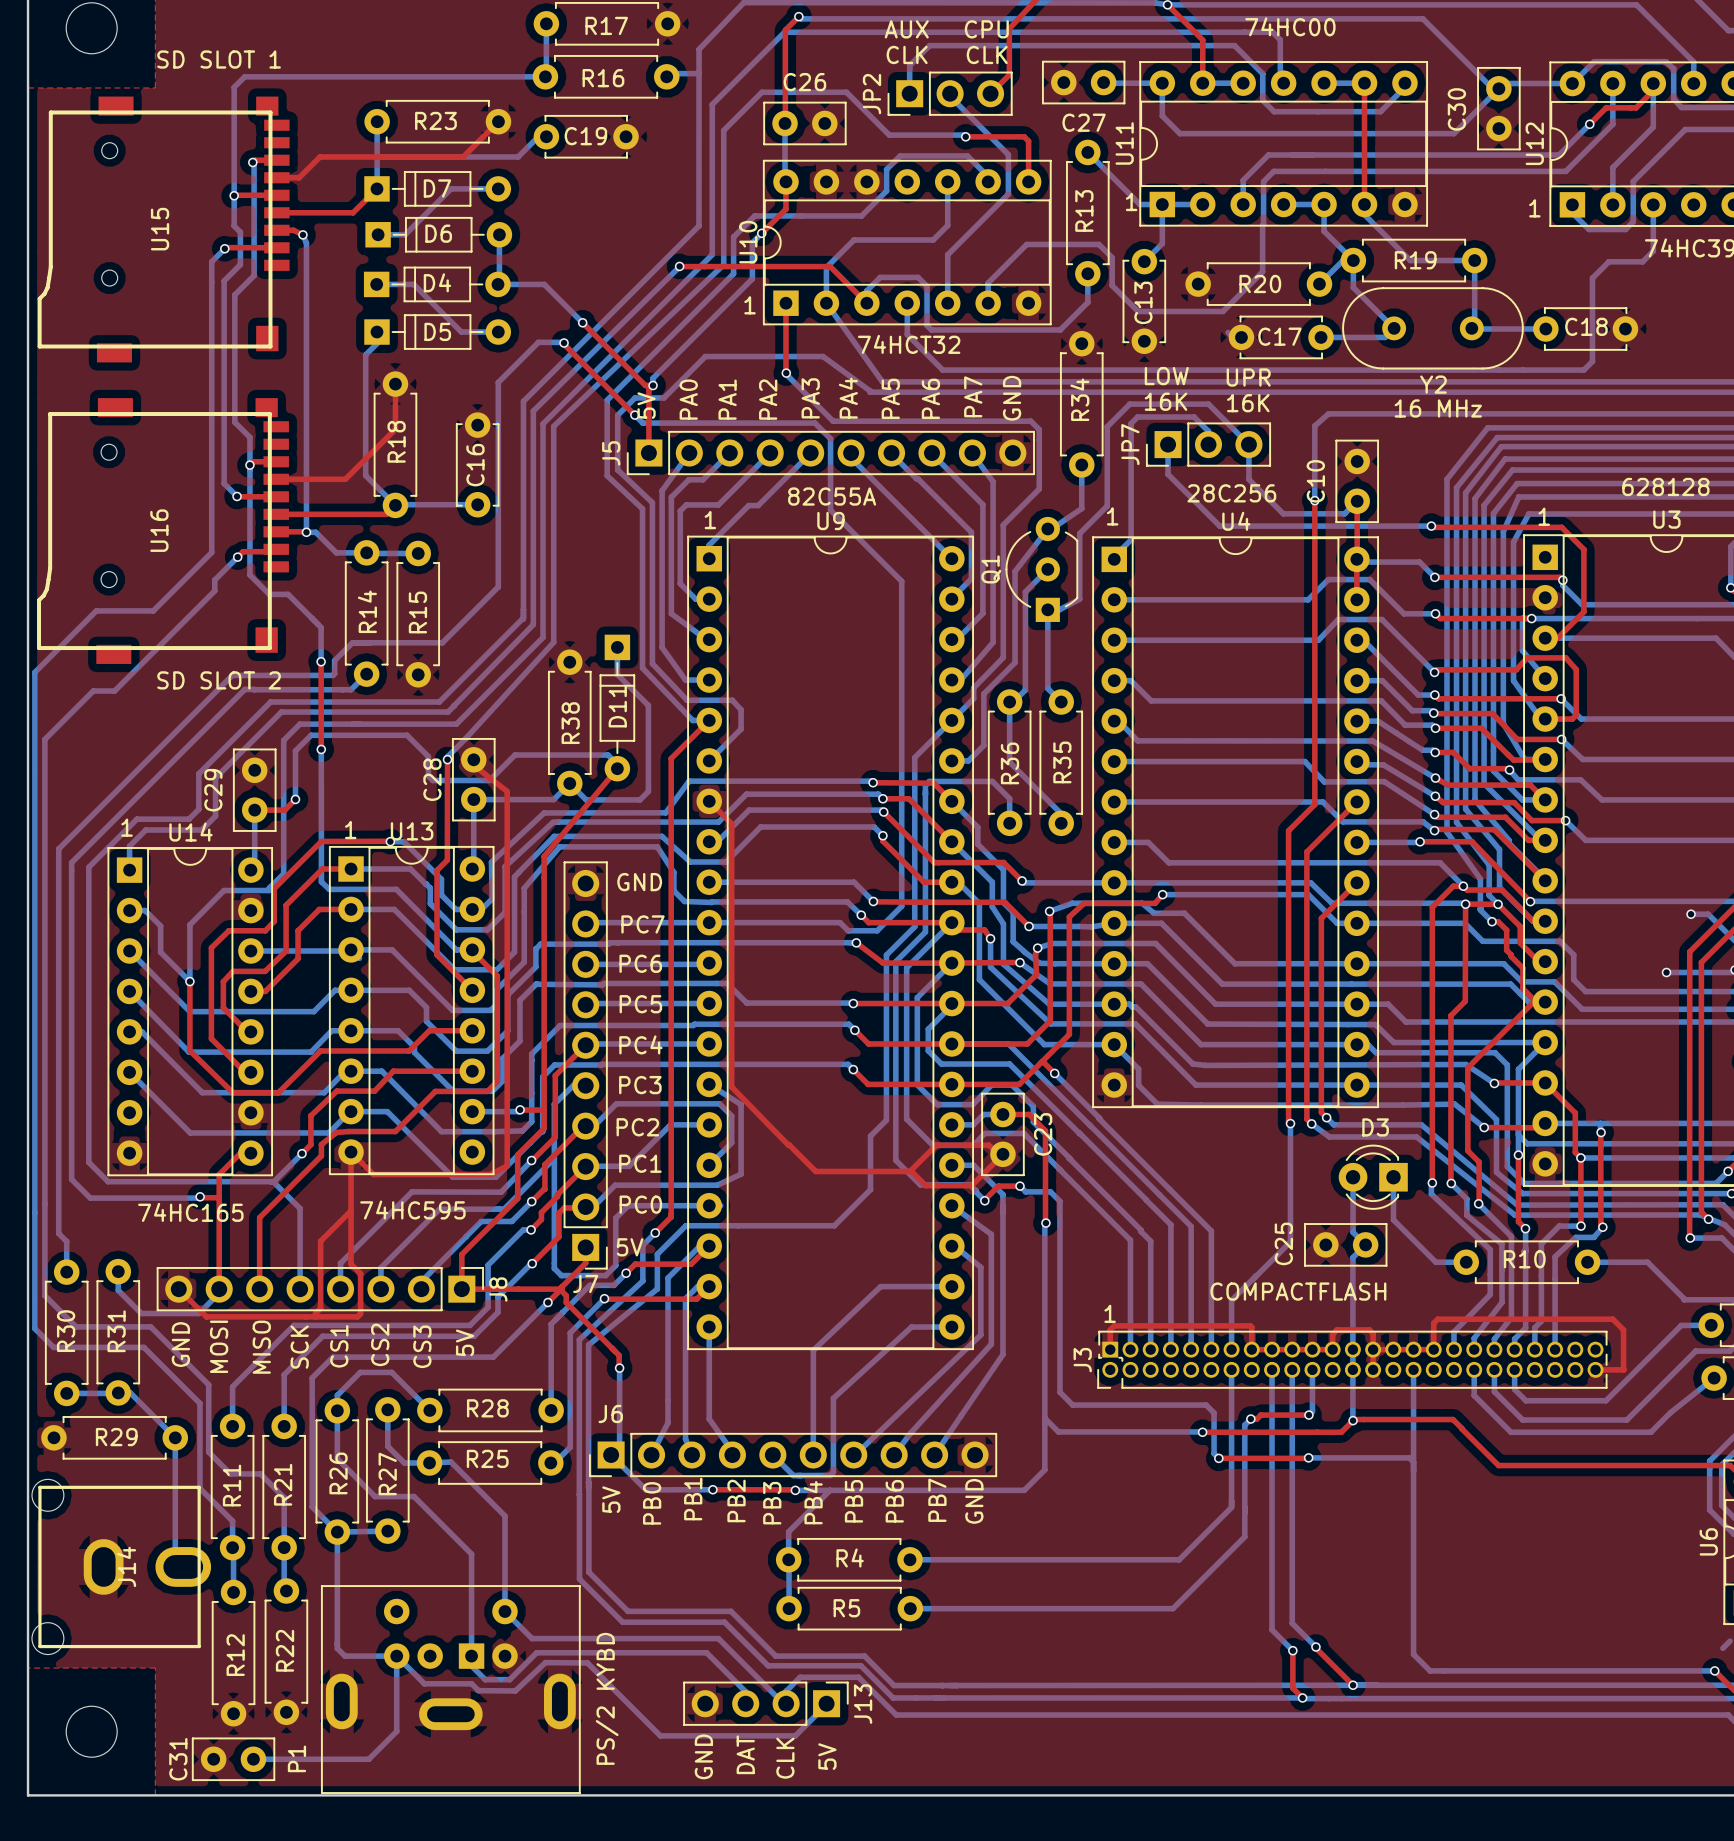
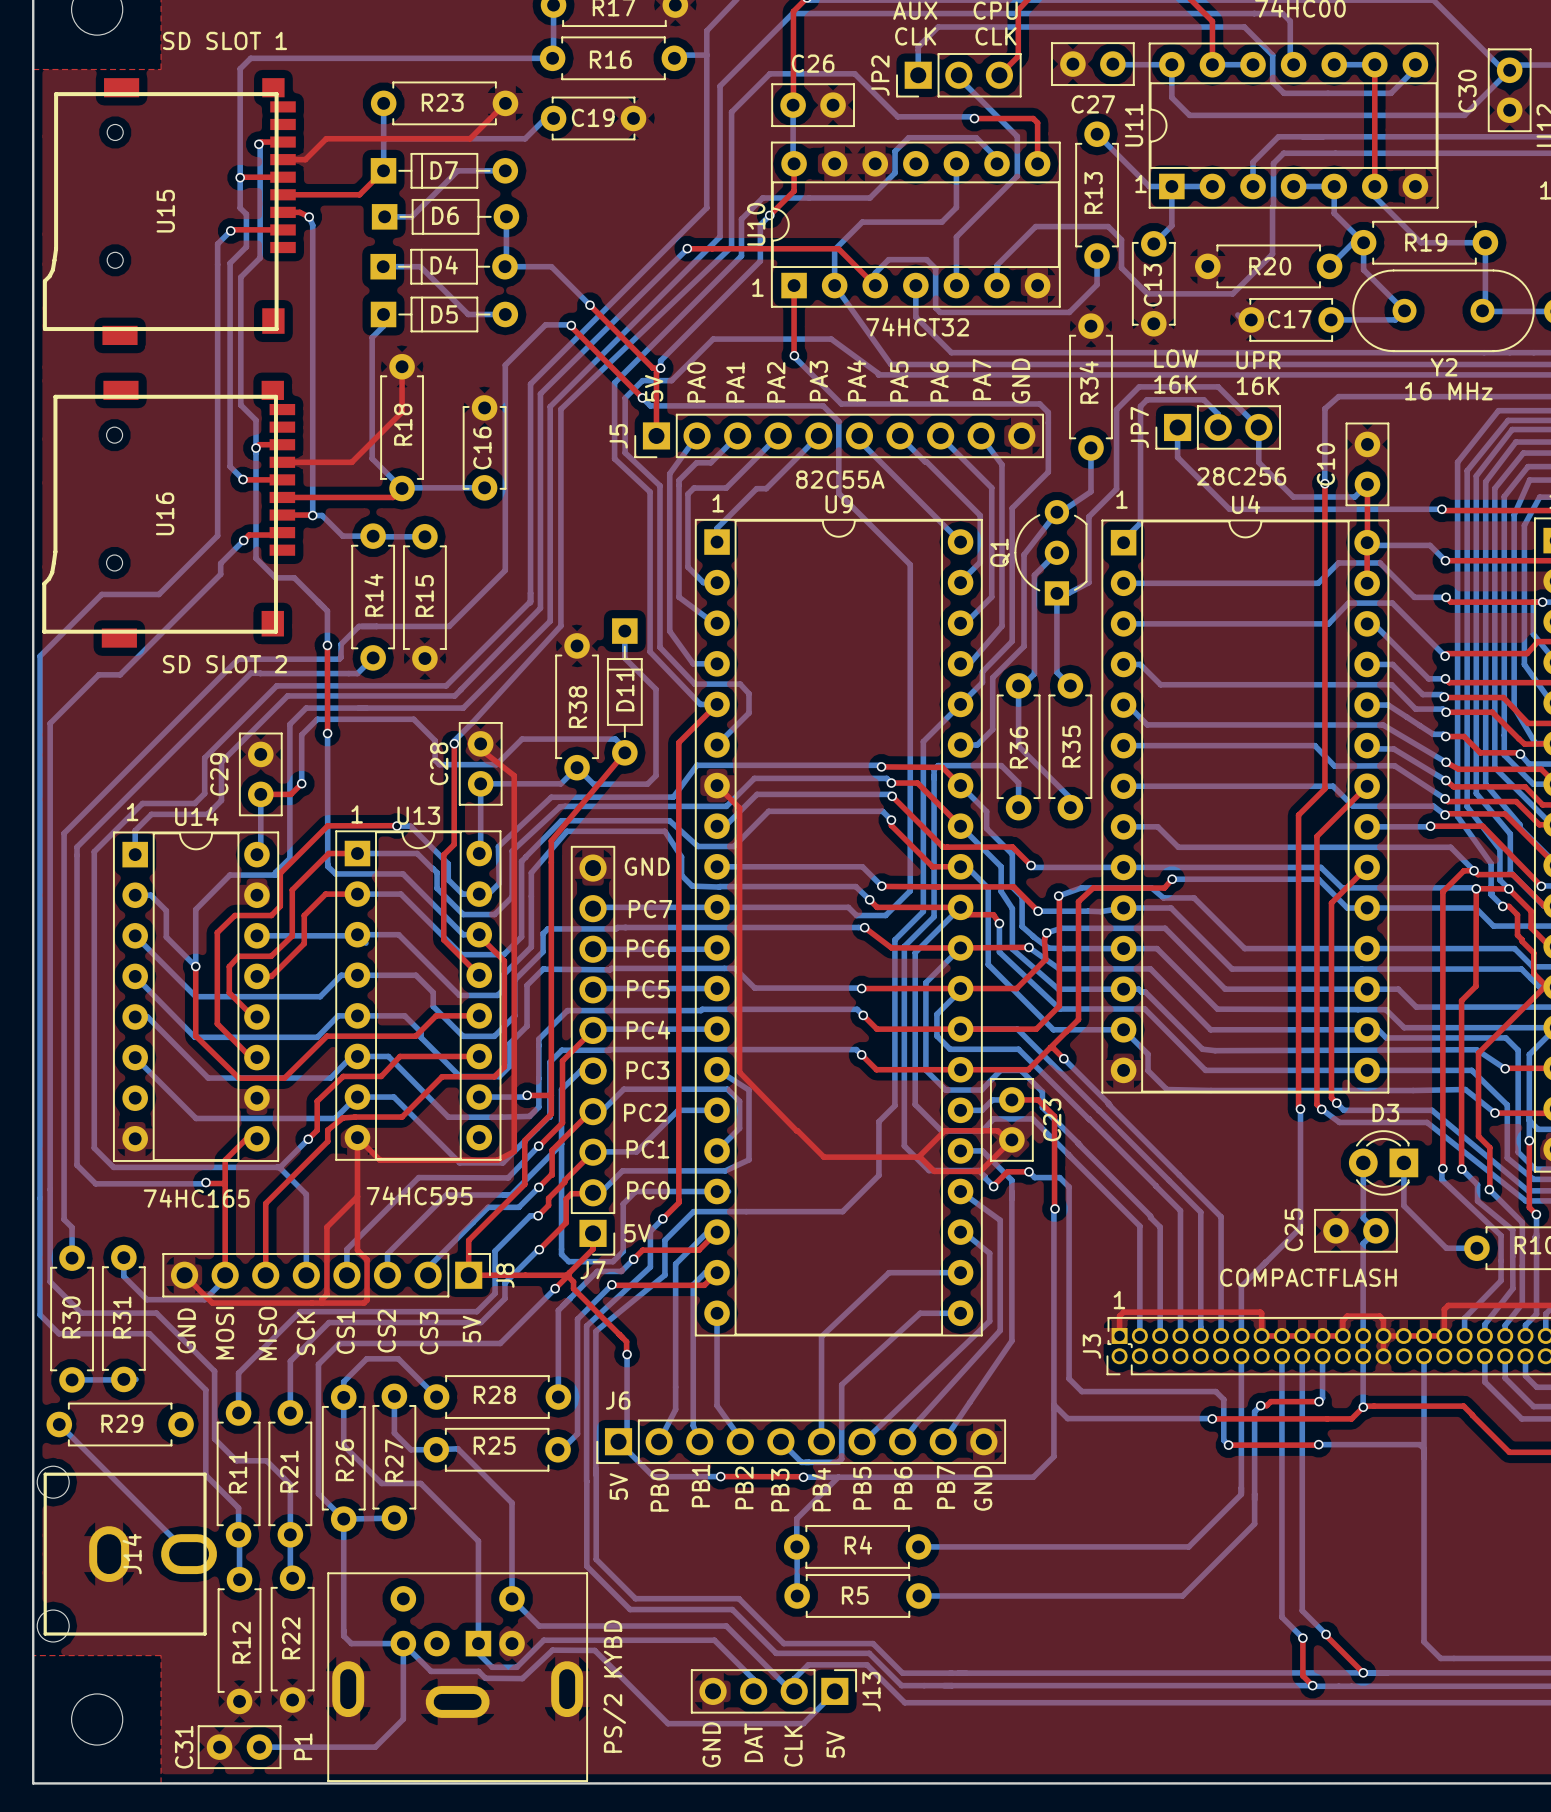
bottom track: (130, 1392) (175, 1437) (175, 1558) -> (55, 1423) (58, 1423) (181, 1546)

